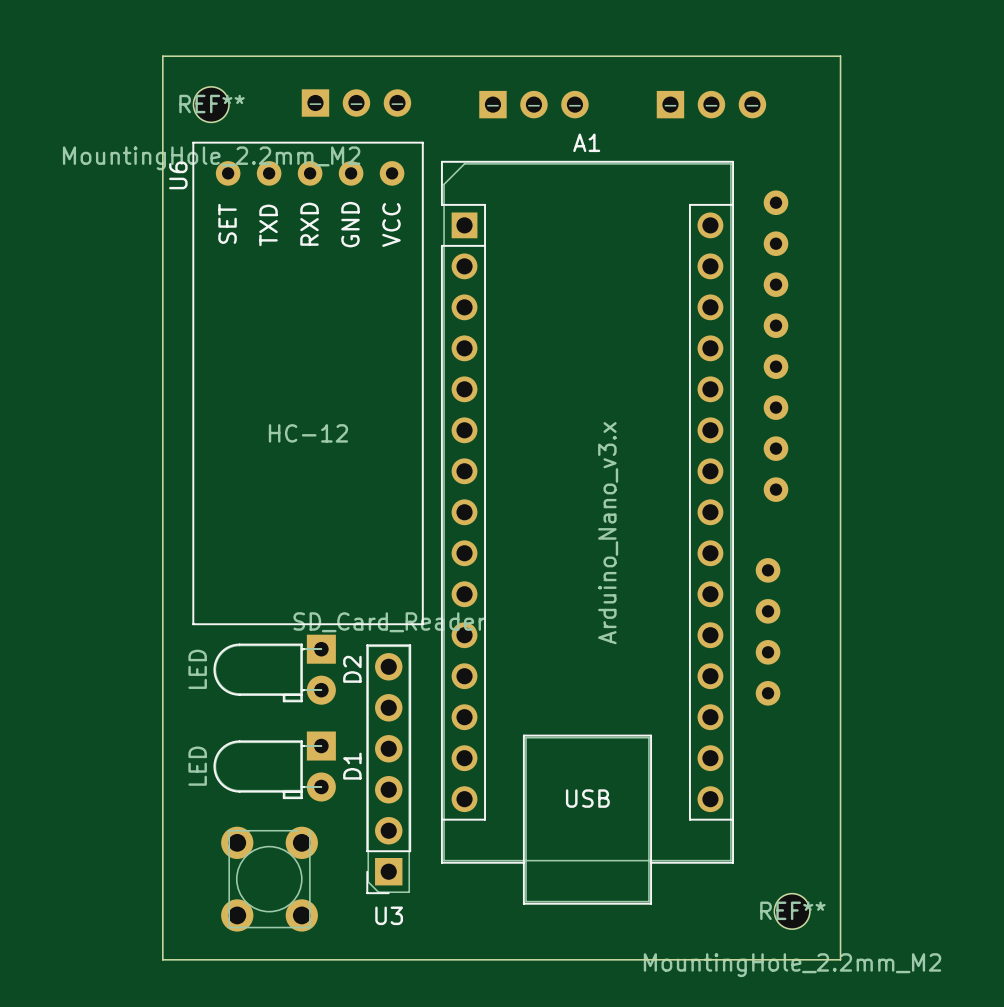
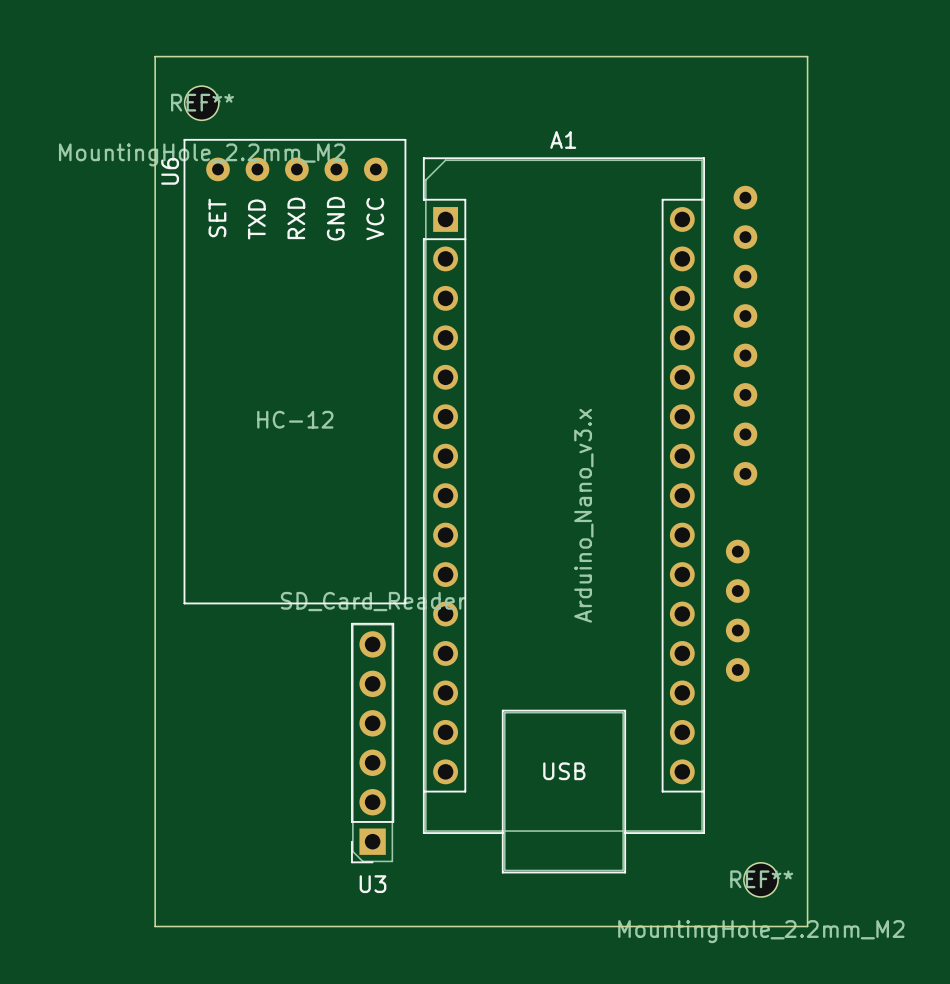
part: (356, 103) -> none
part: (533, 104) -> none
part: (711, 104) -> none
D2: LED (274, 669) -> none
D1: LED (274, 766) -> none
part: (269, 879) -> none

